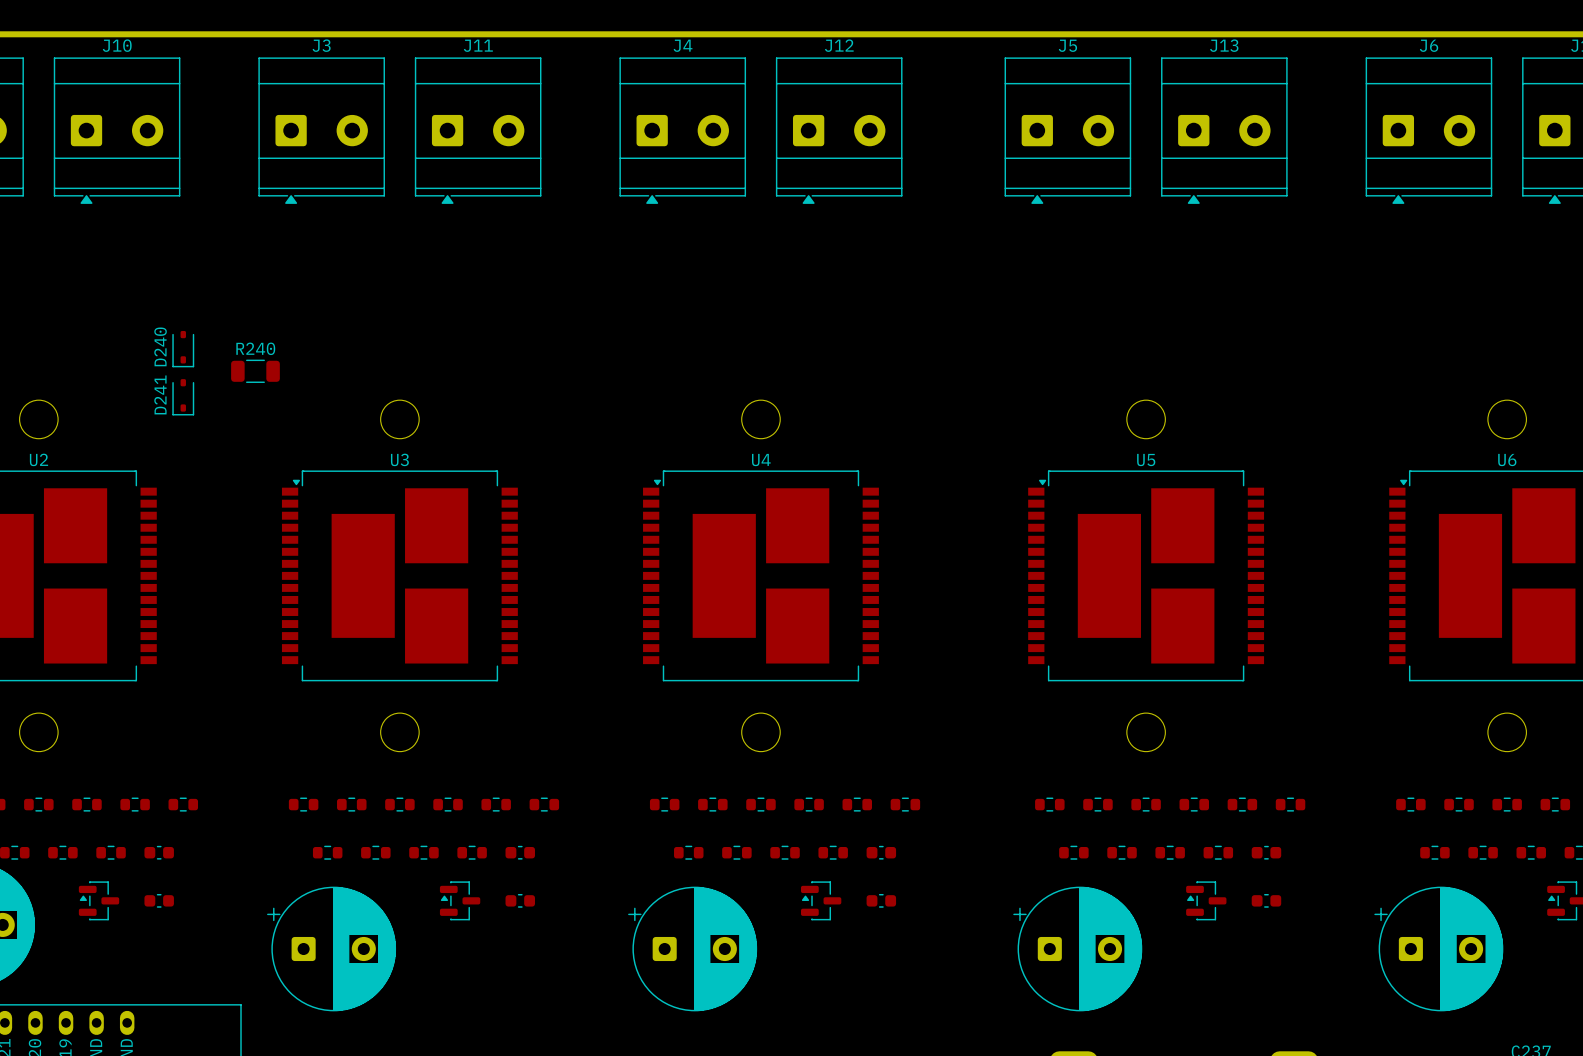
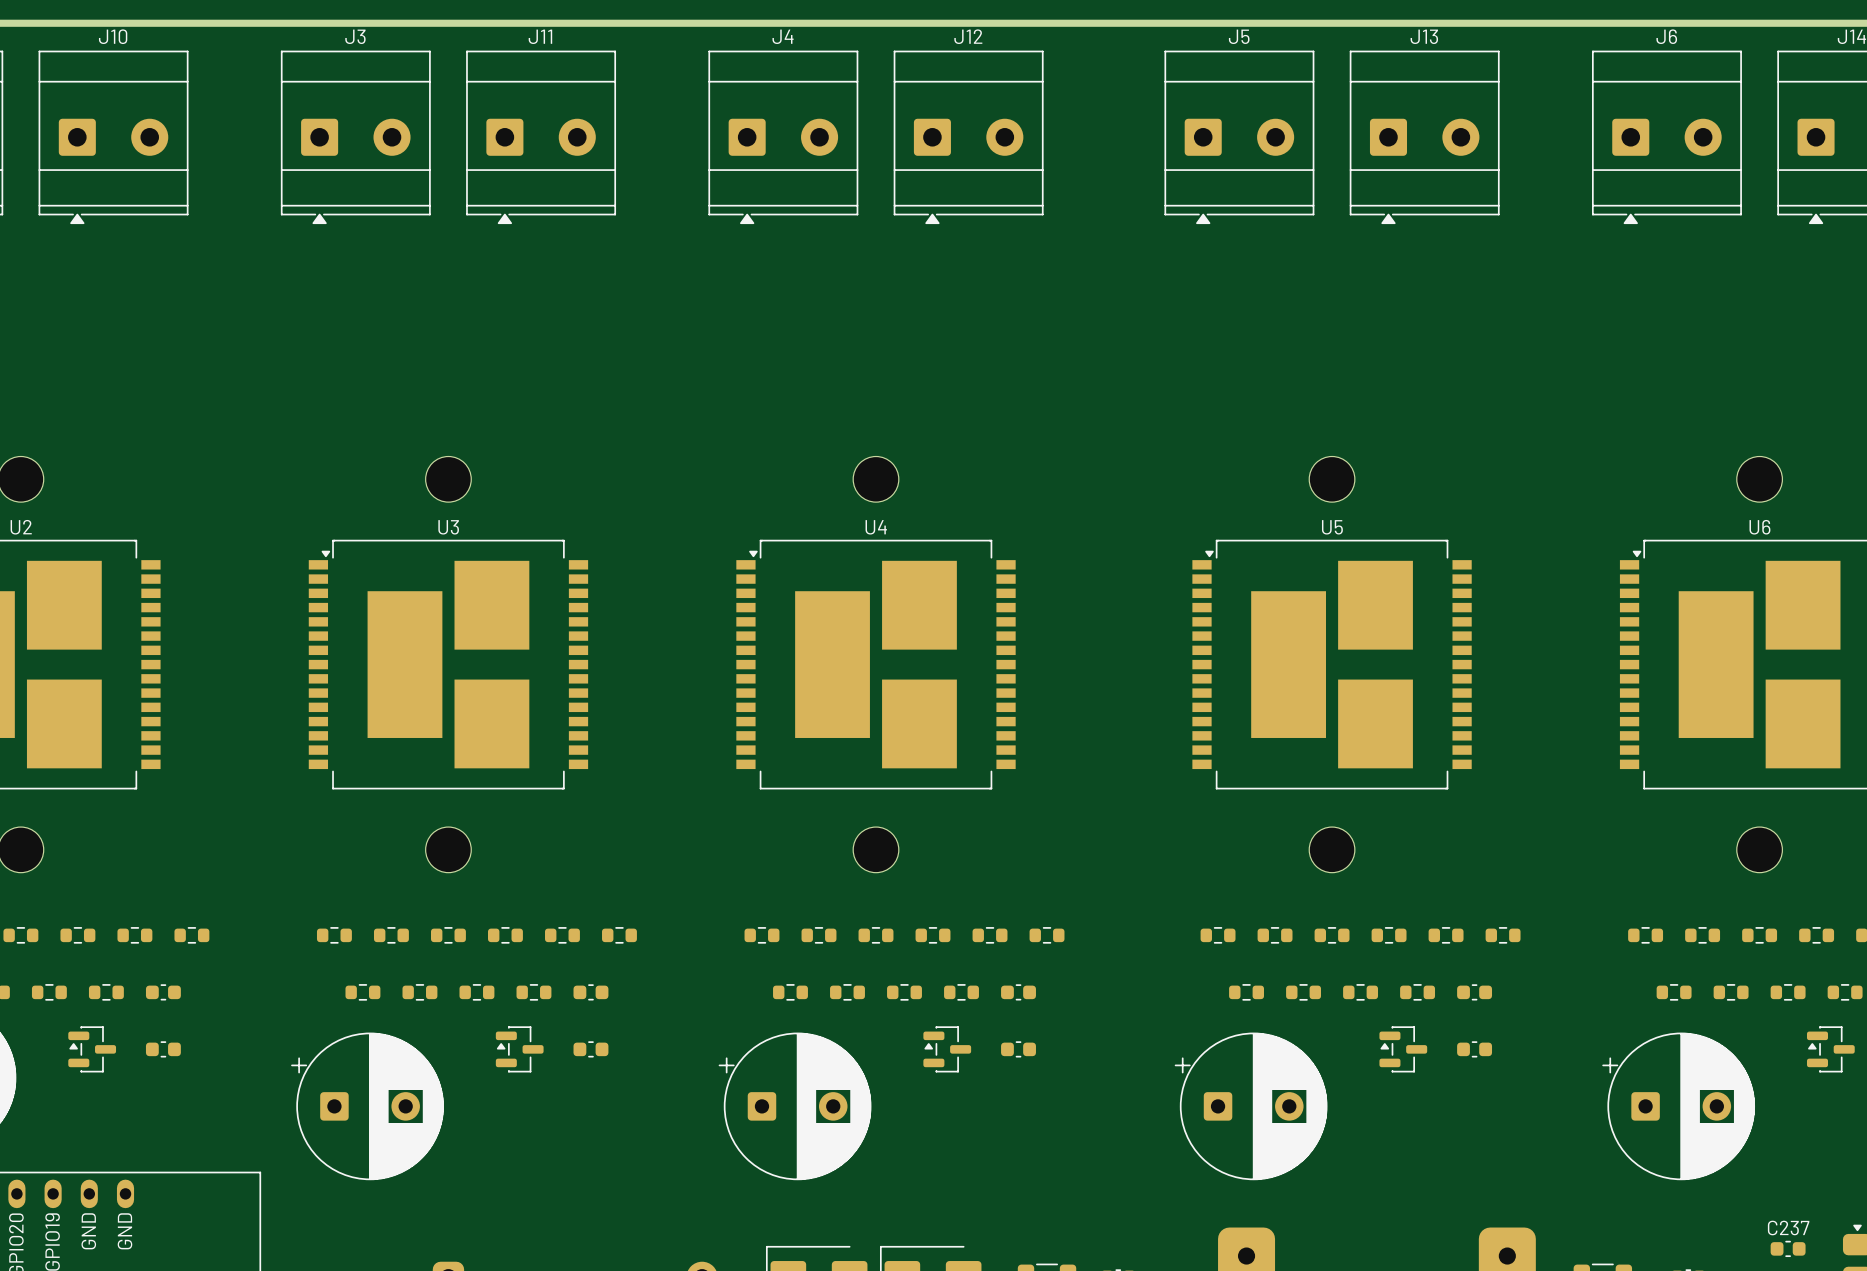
D240: (183, 349) -> none
R240: (255, 371) -> none
D241: (183, 397) -> none

